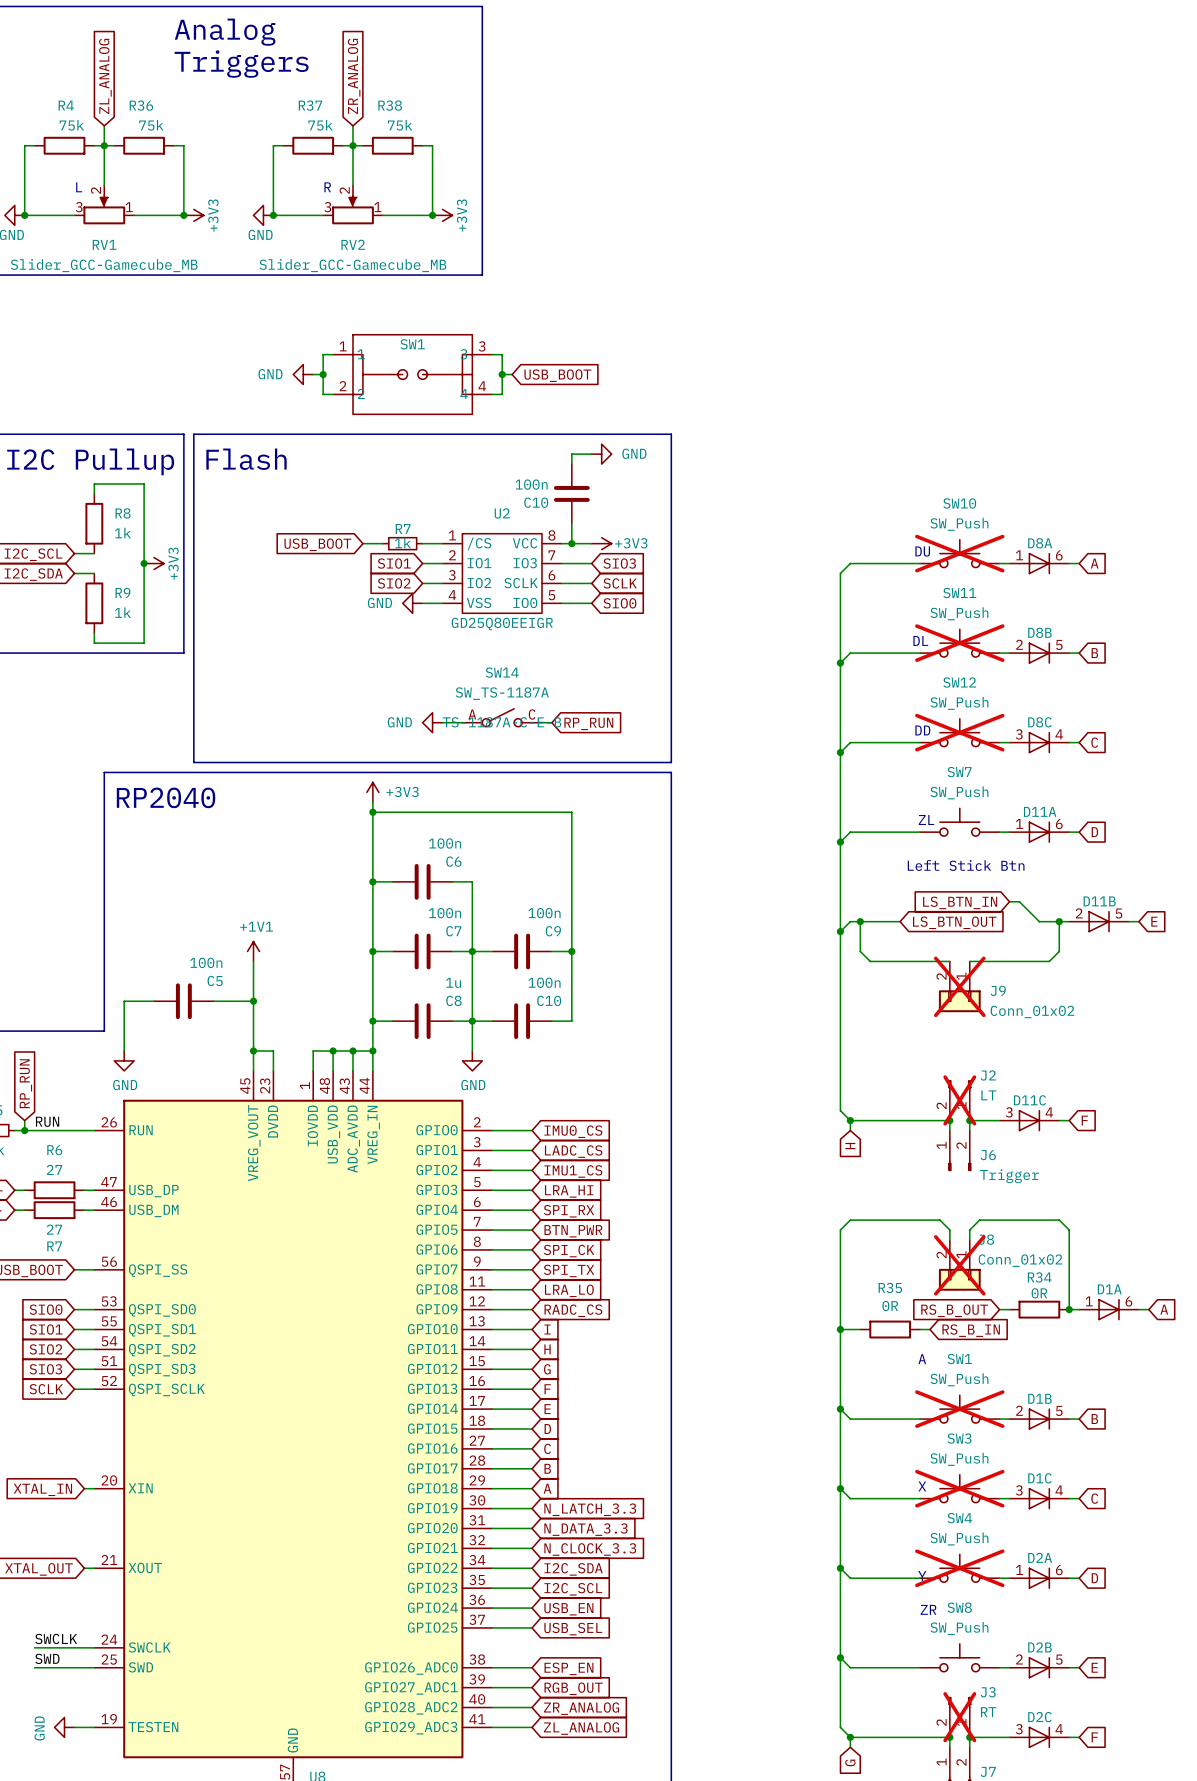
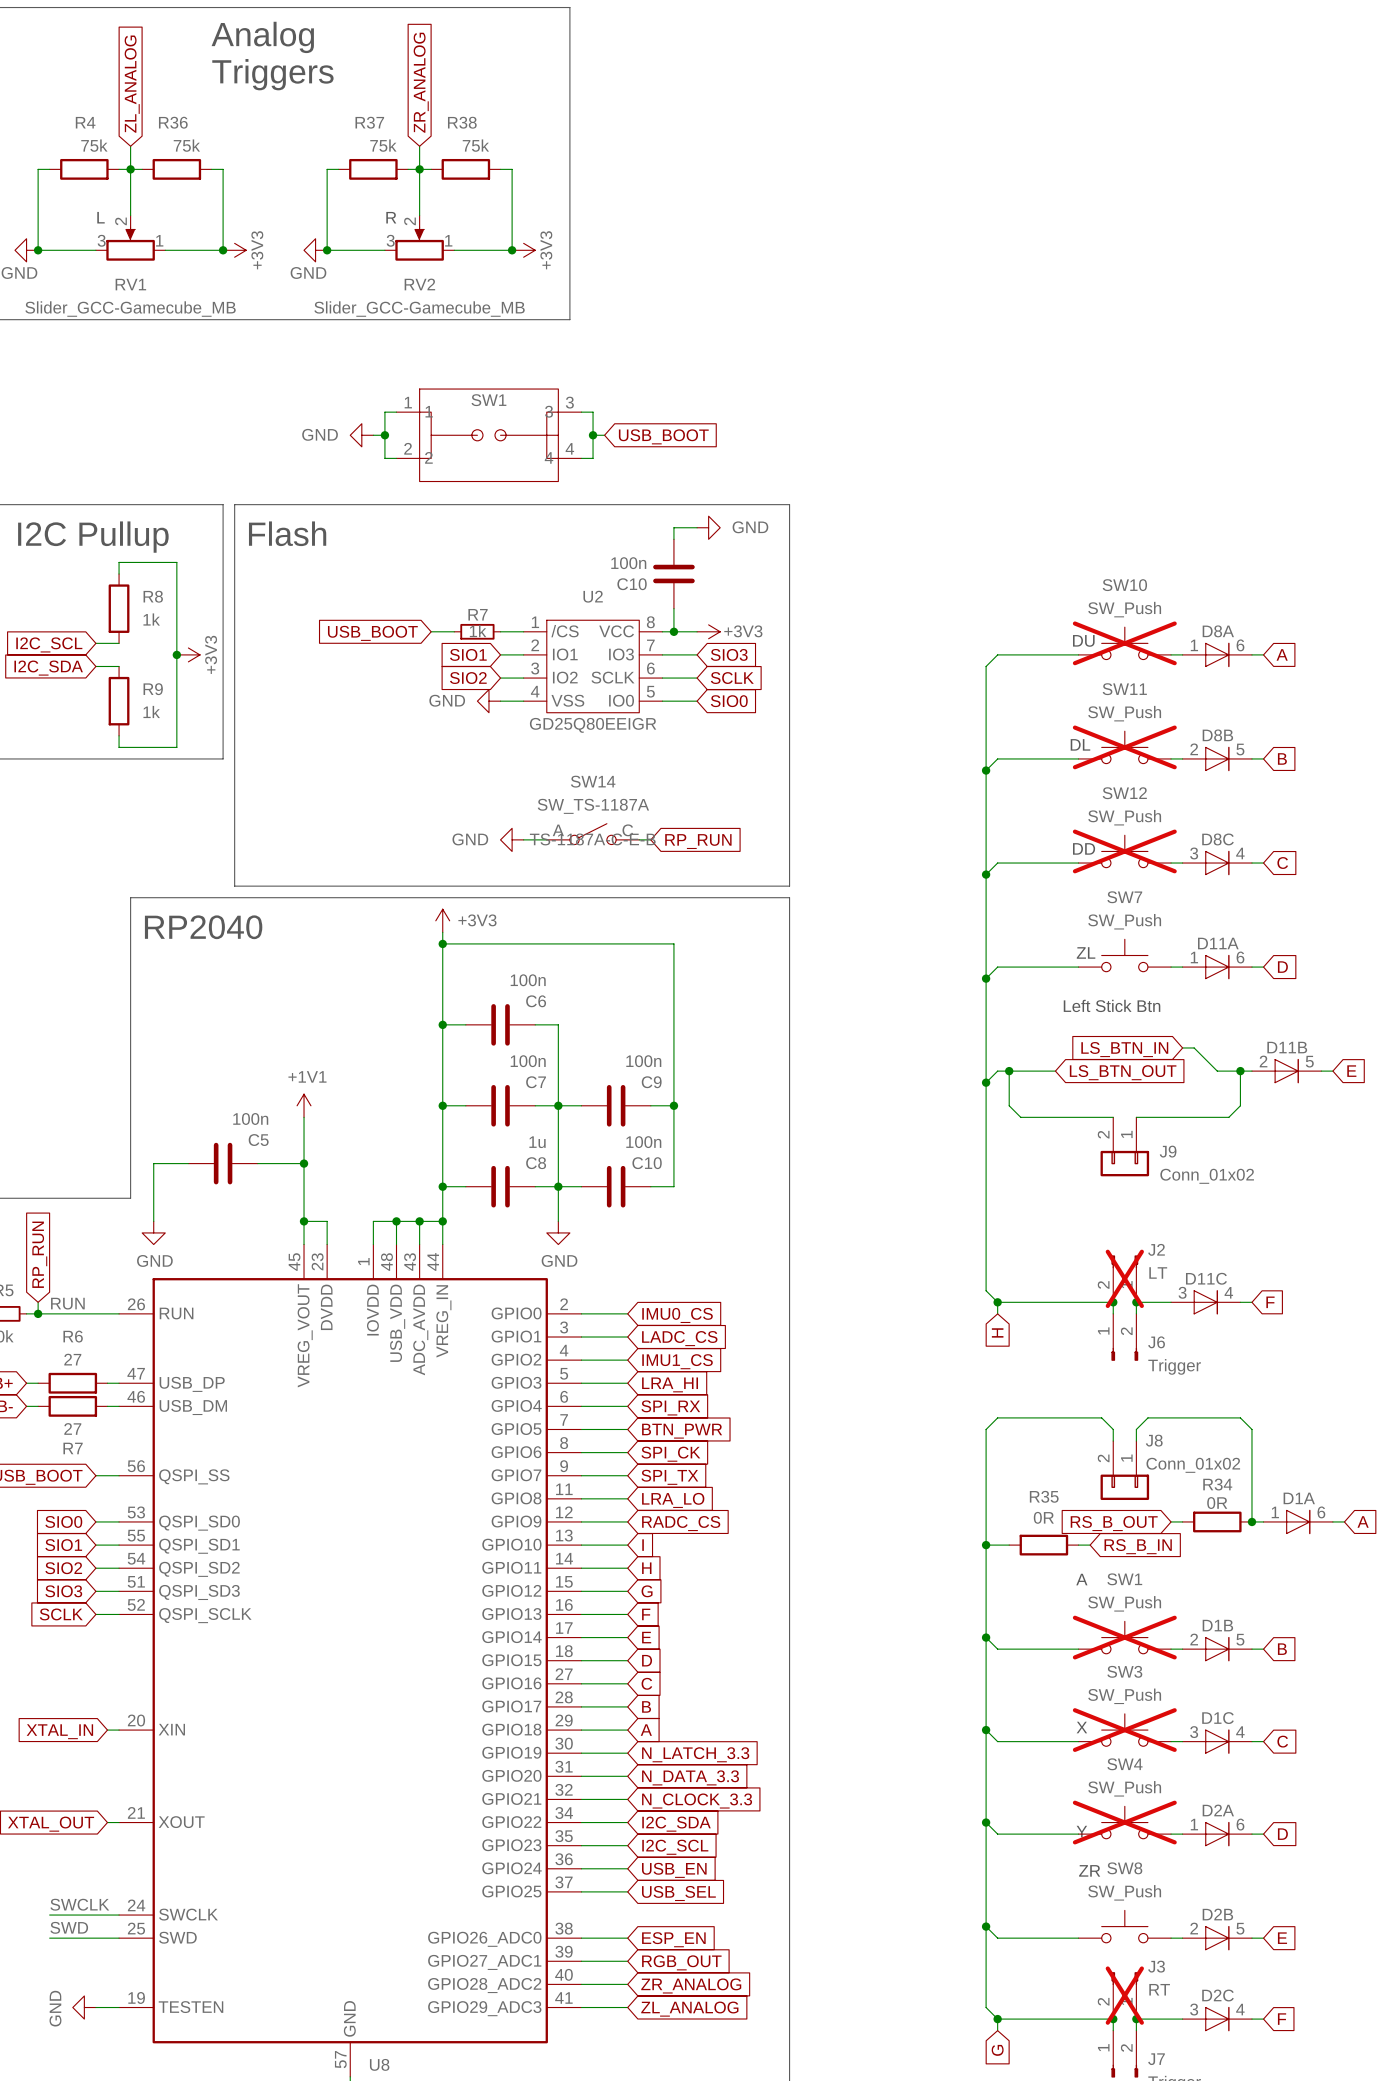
J9 do-not-place cross: (959, 986) -> none
J8 do-not-place cross: (959, 1265) -> none

